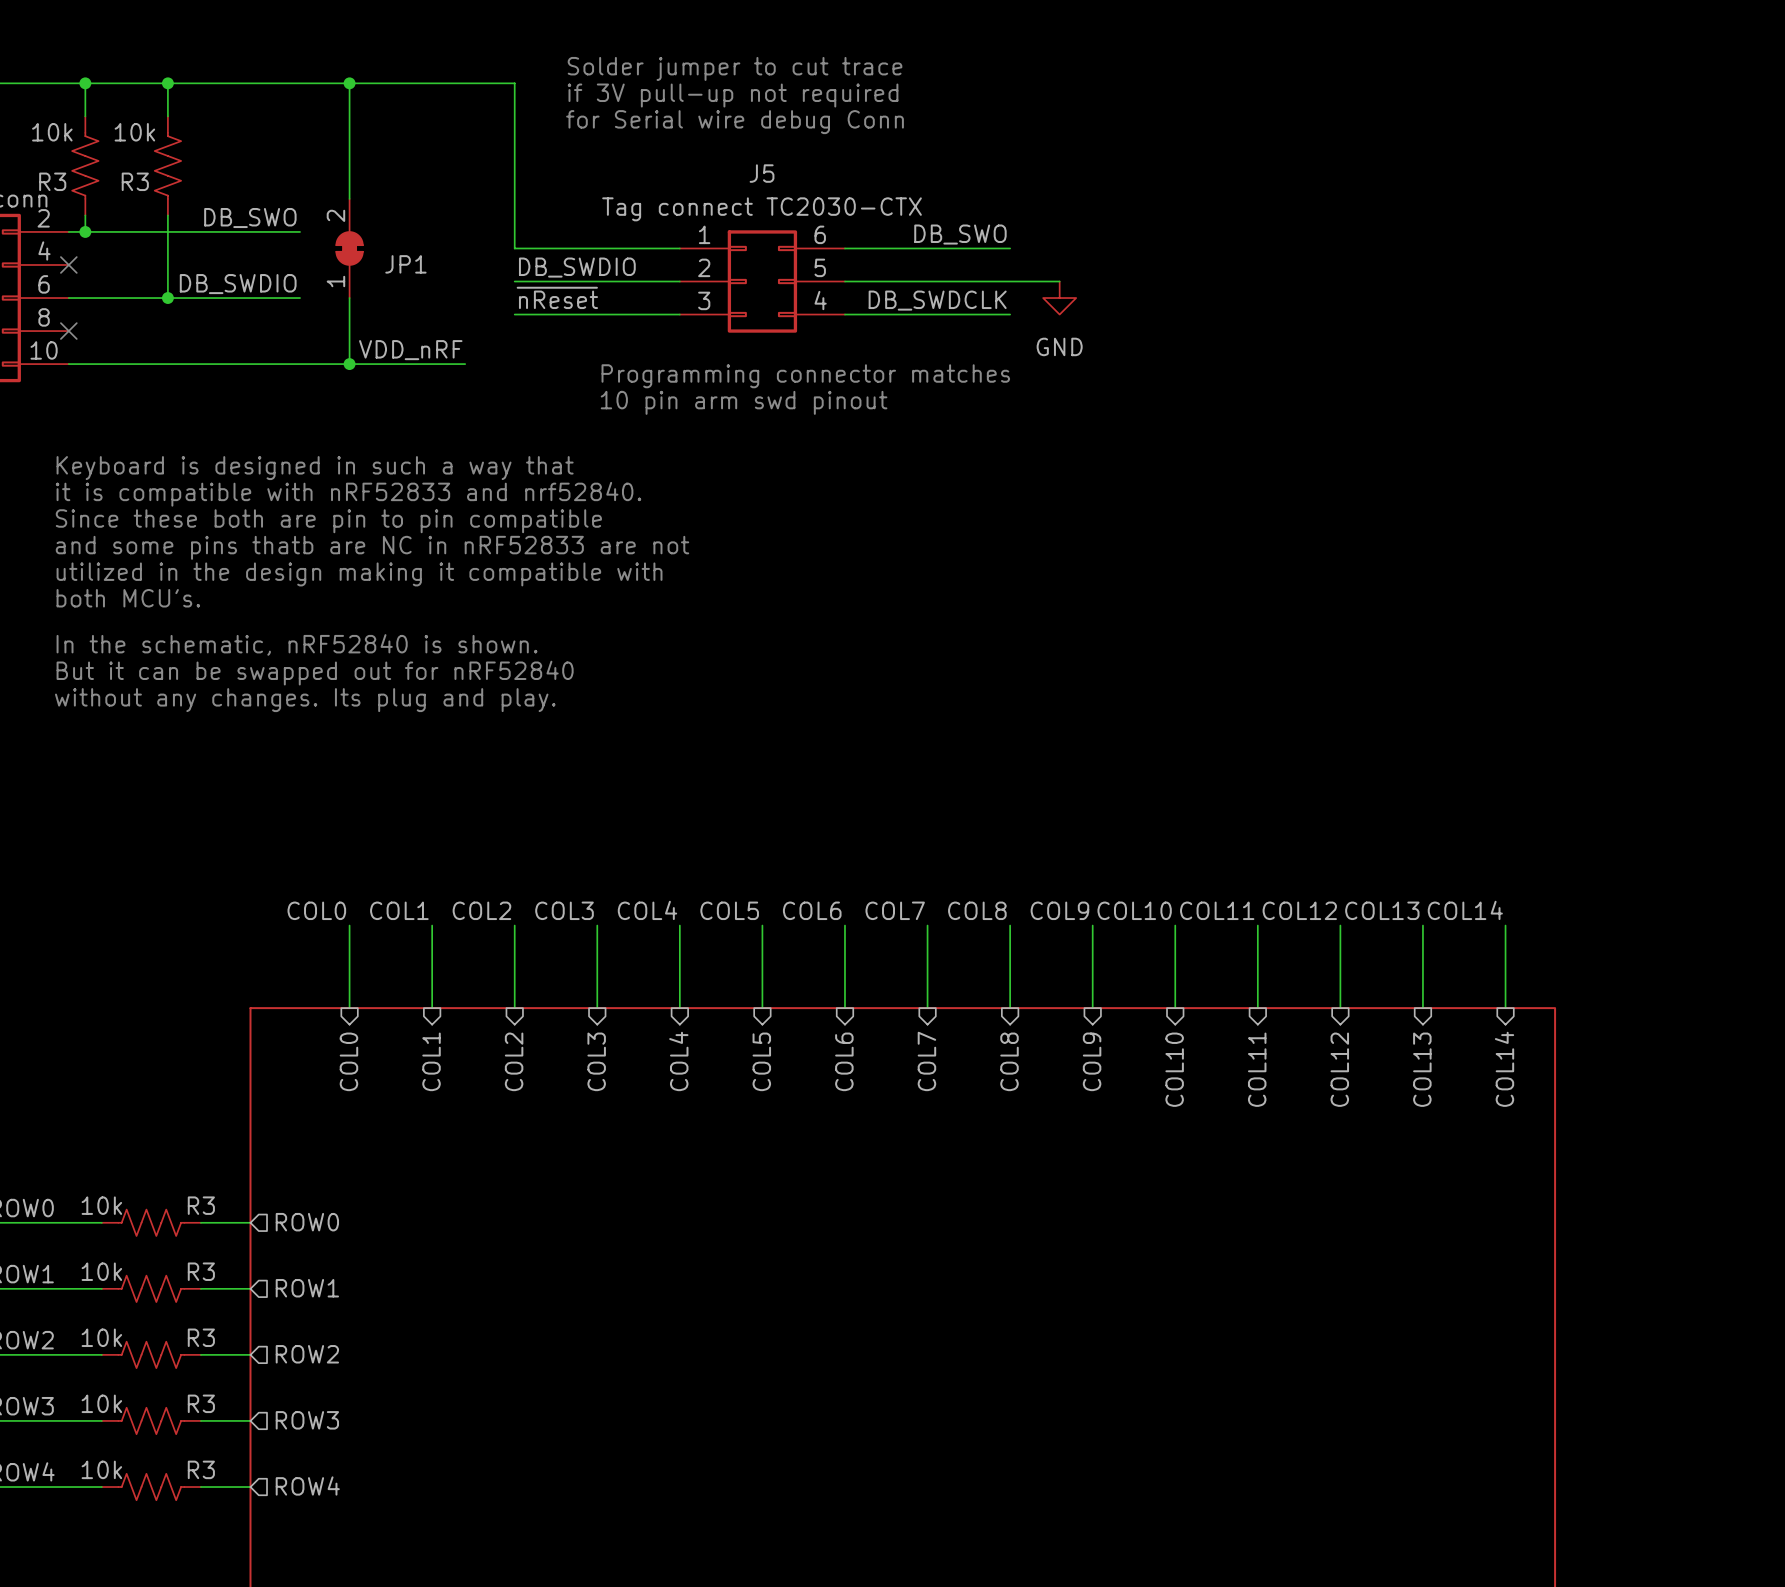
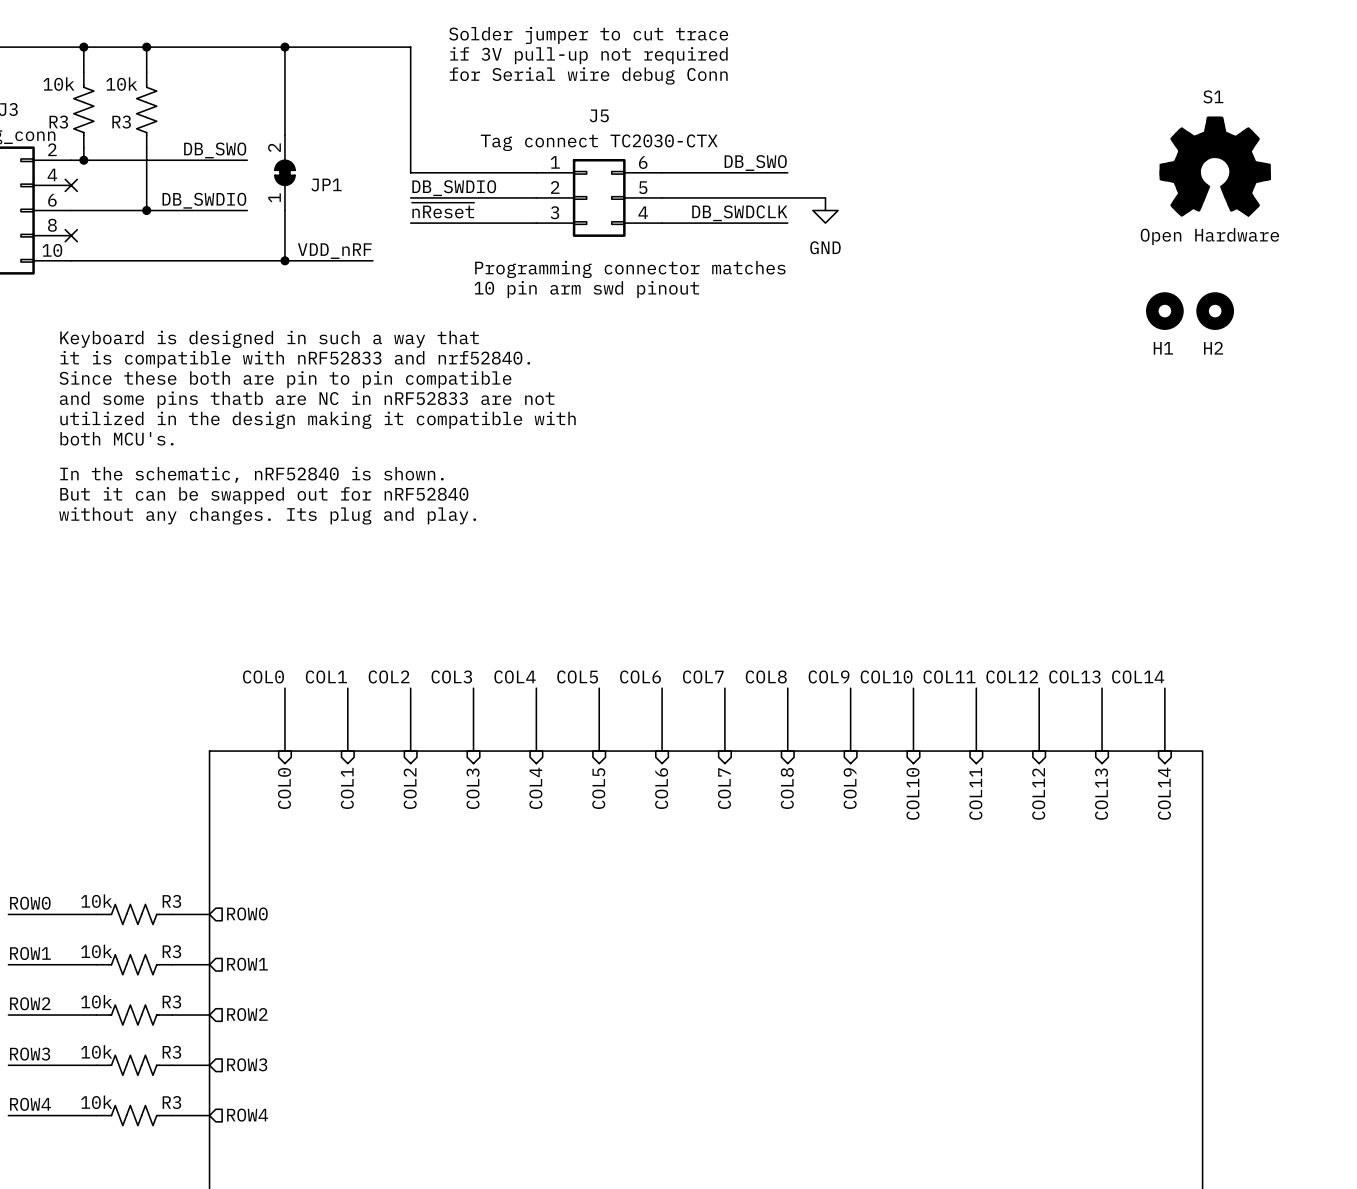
S1: none -> Open Hardware (1215, 166)
H1: none -> (1164, 311)
H2: none -> (1215, 311)

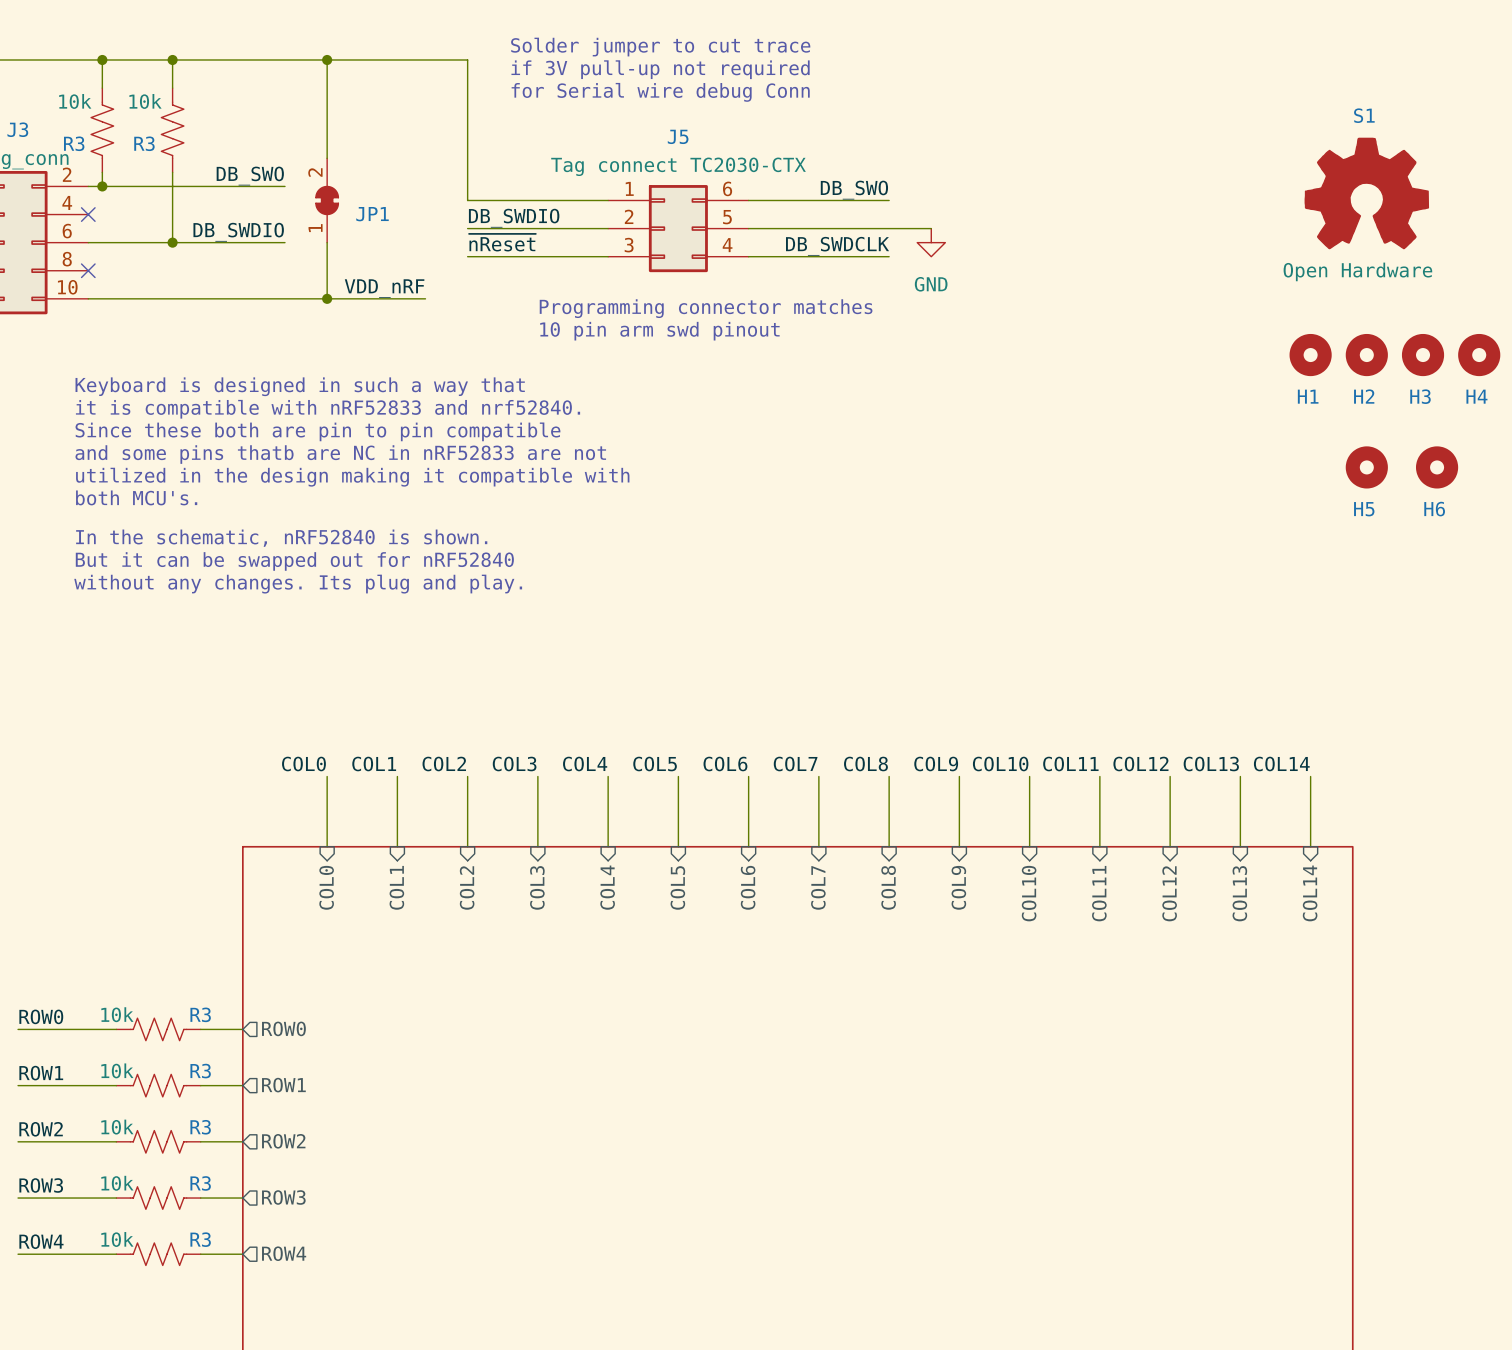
H3: none -> (1423, 355)
H4: none -> (1479, 355)
H5: none -> (1366, 467)
H6: none -> (1437, 467)

